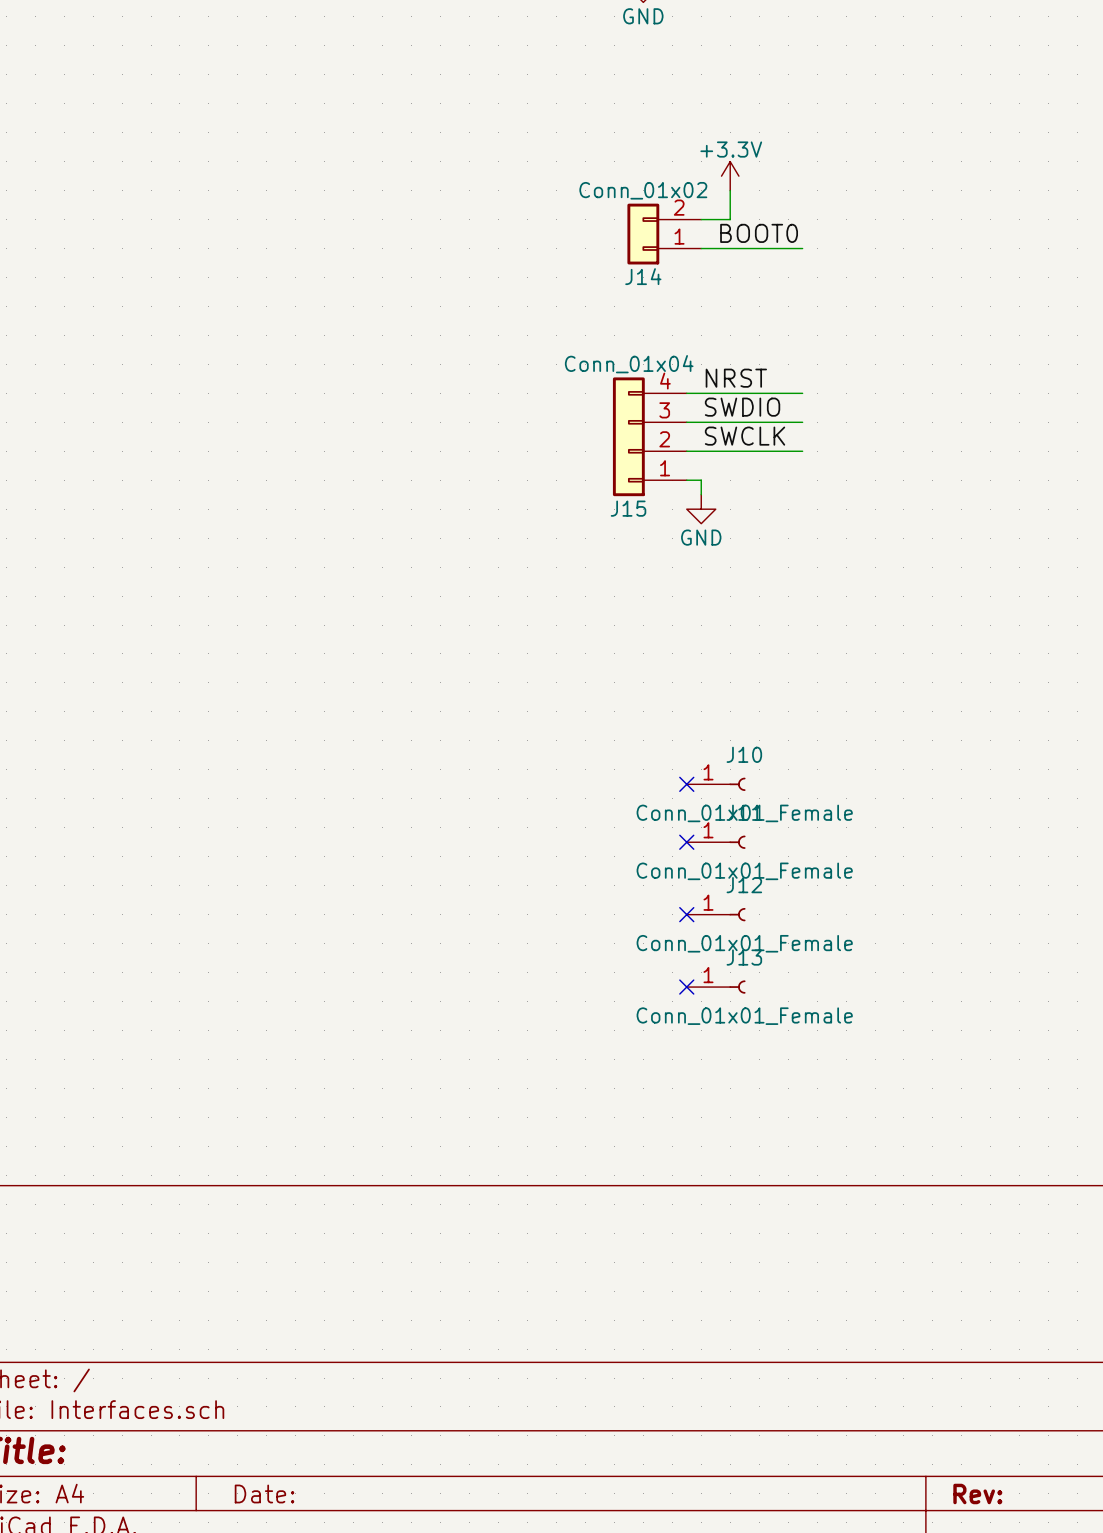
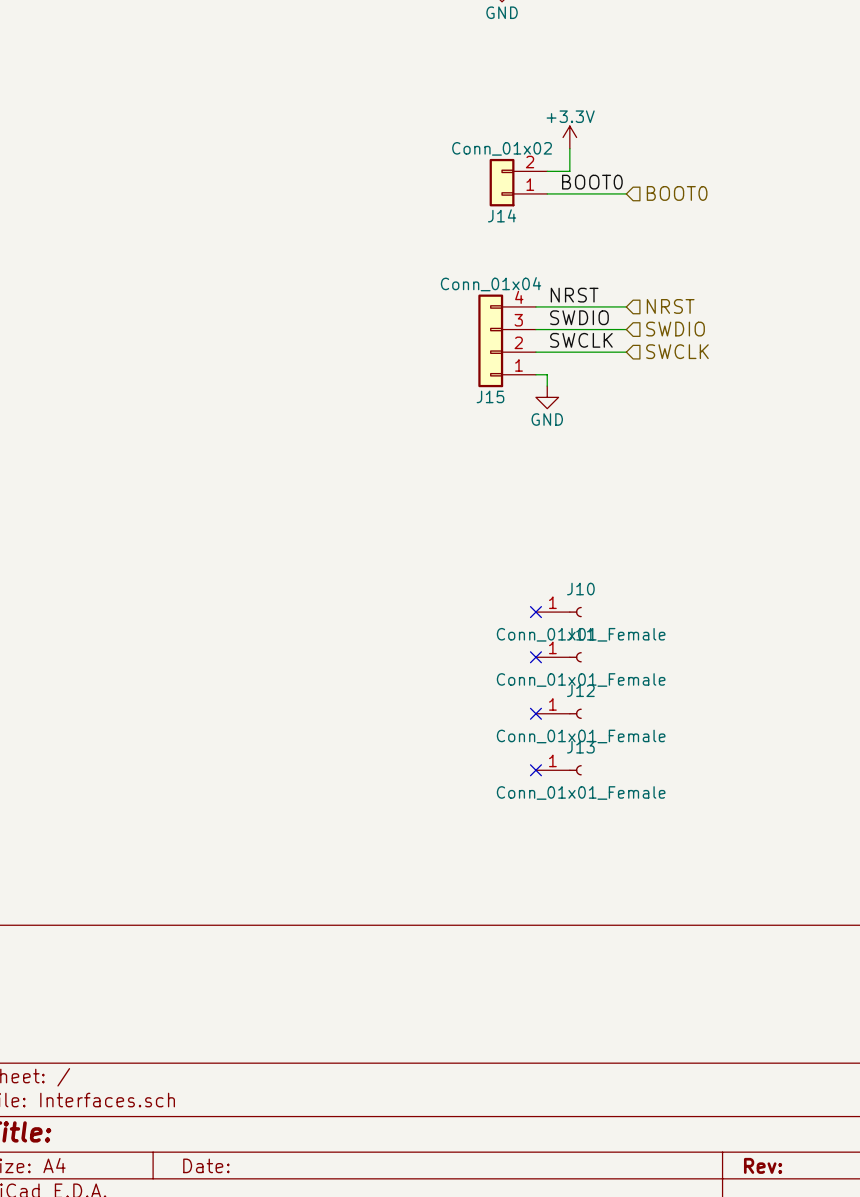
hierarchical label: none -> BOOT0 (677, 193)
hierarchical label: none -> NRST (670, 306)
hierarchical label: none -> SWDIO (675, 329)
hierarchical label: none -> SWCLK (677, 351)

